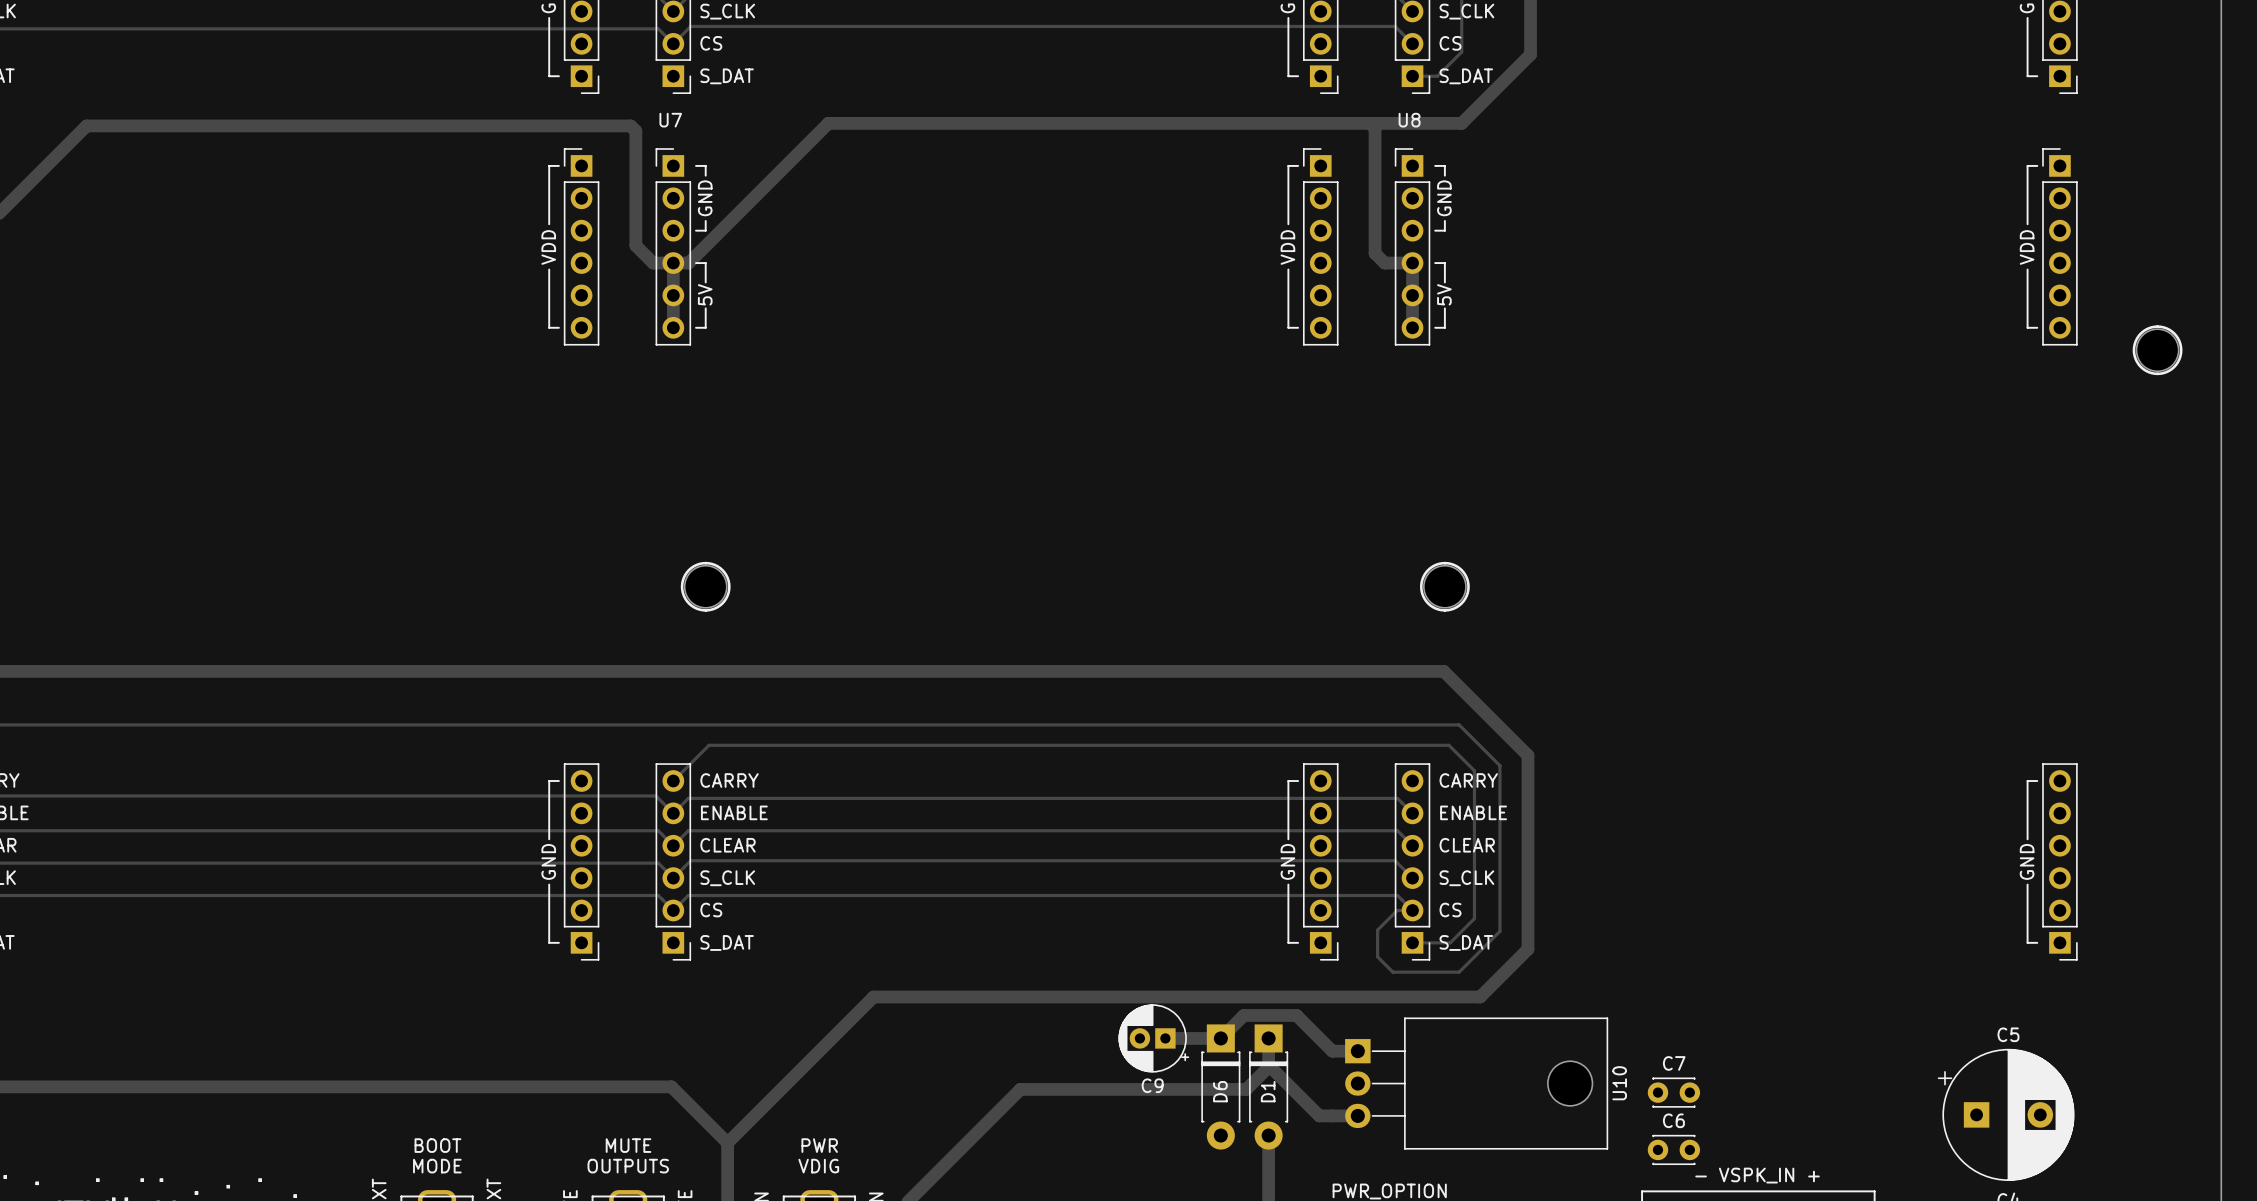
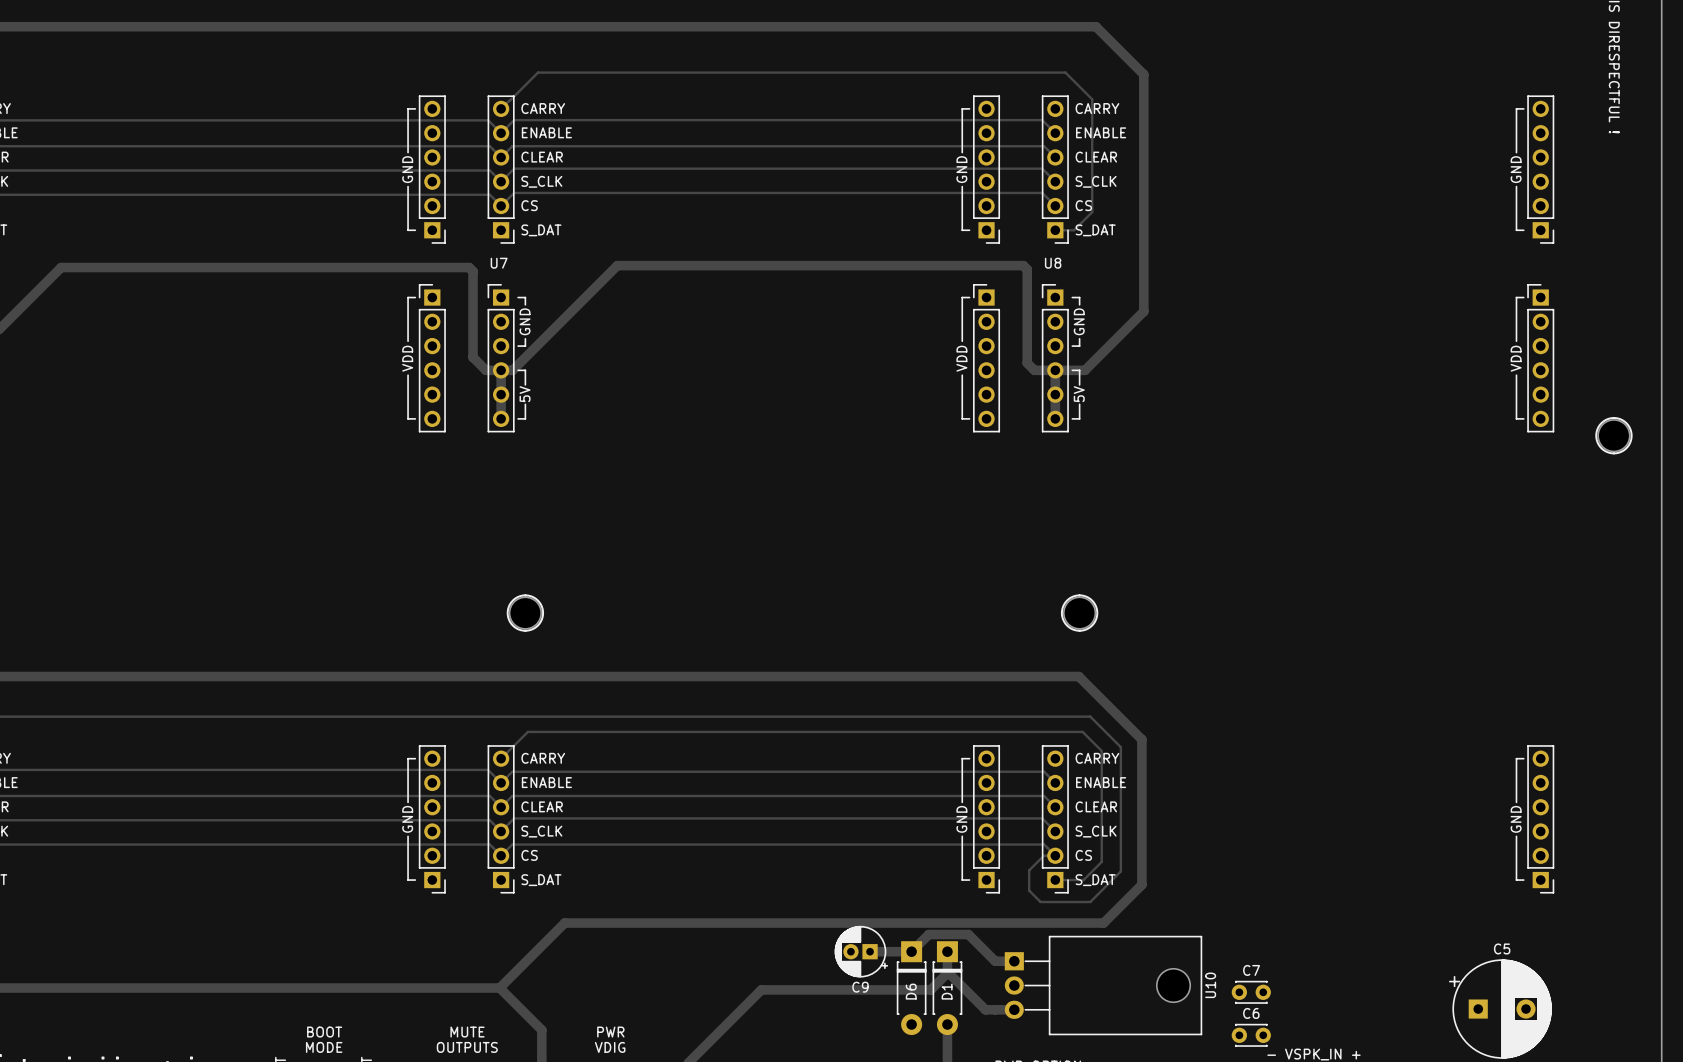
track: (1530, 54) (1461, 123) (1369, 123) -> (1143, 214) (1143, 311) (1084, 370) (1055, 370)
track: (1480, 997) (873, 997) (727, 1142) -> (1106, 920) (1103, 923) (564, 923) (499, 988)

